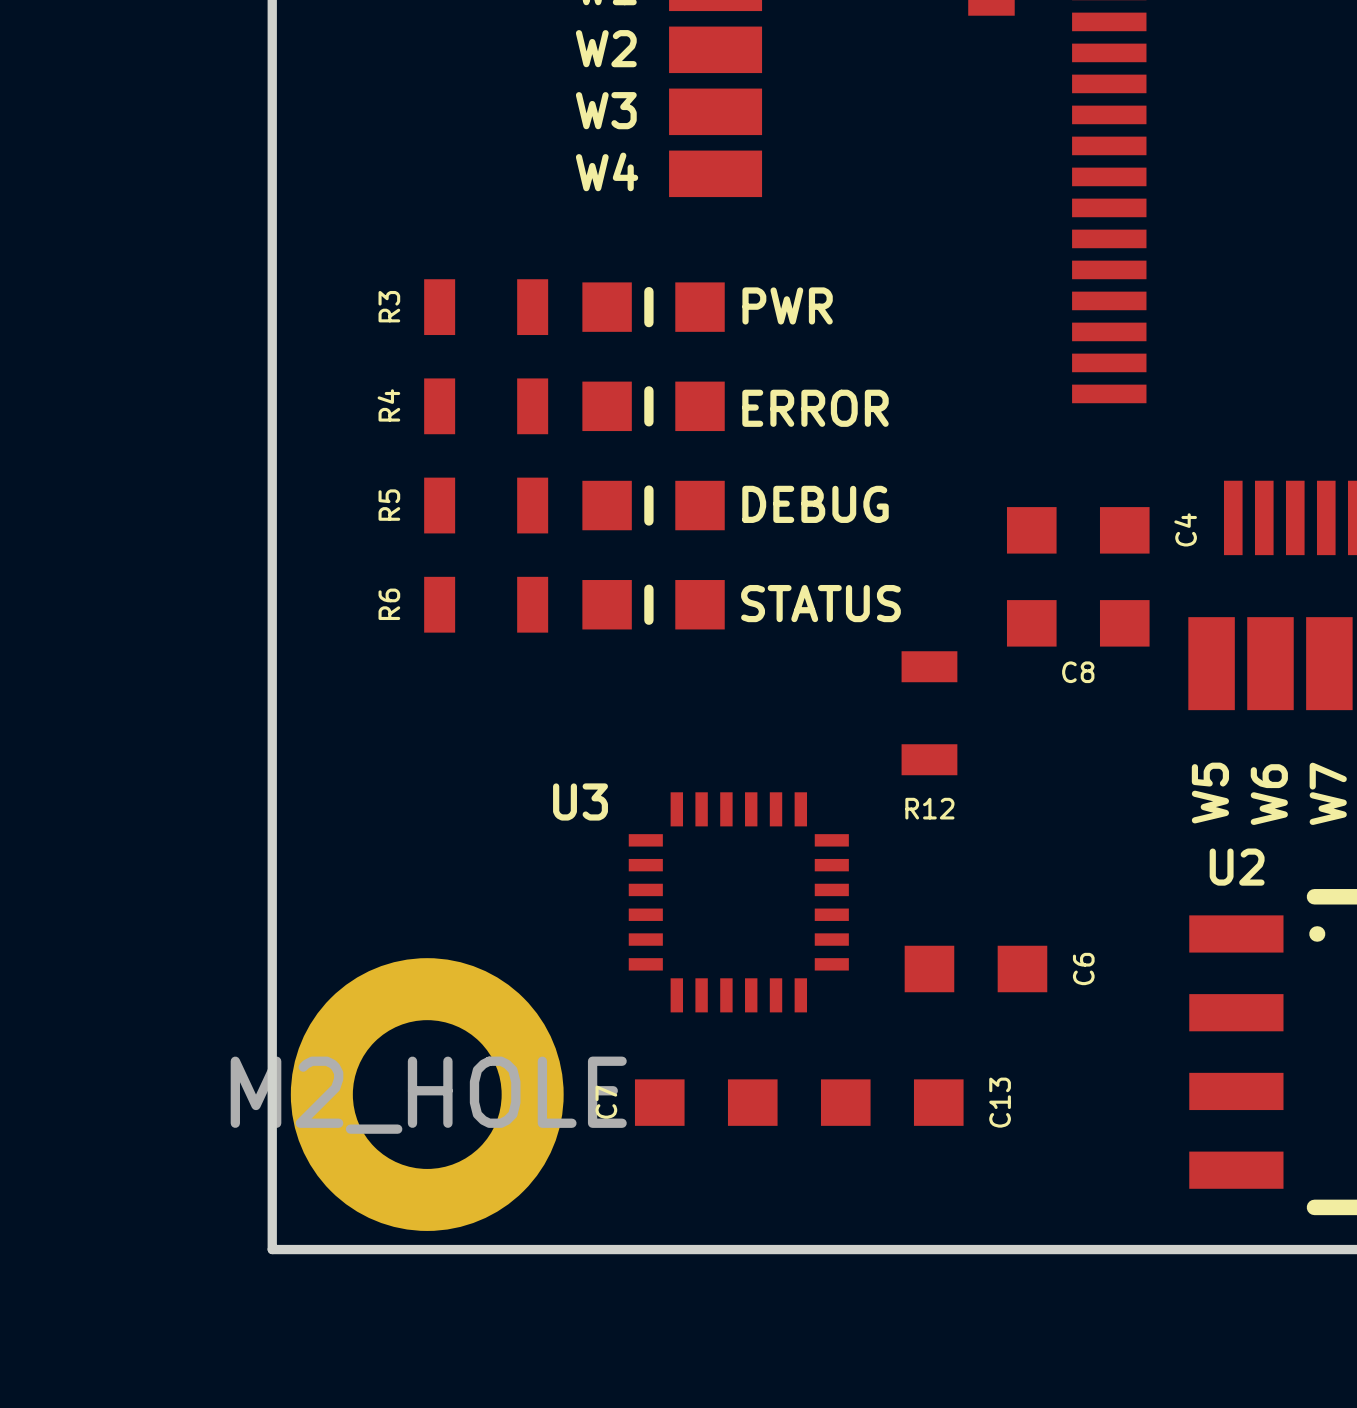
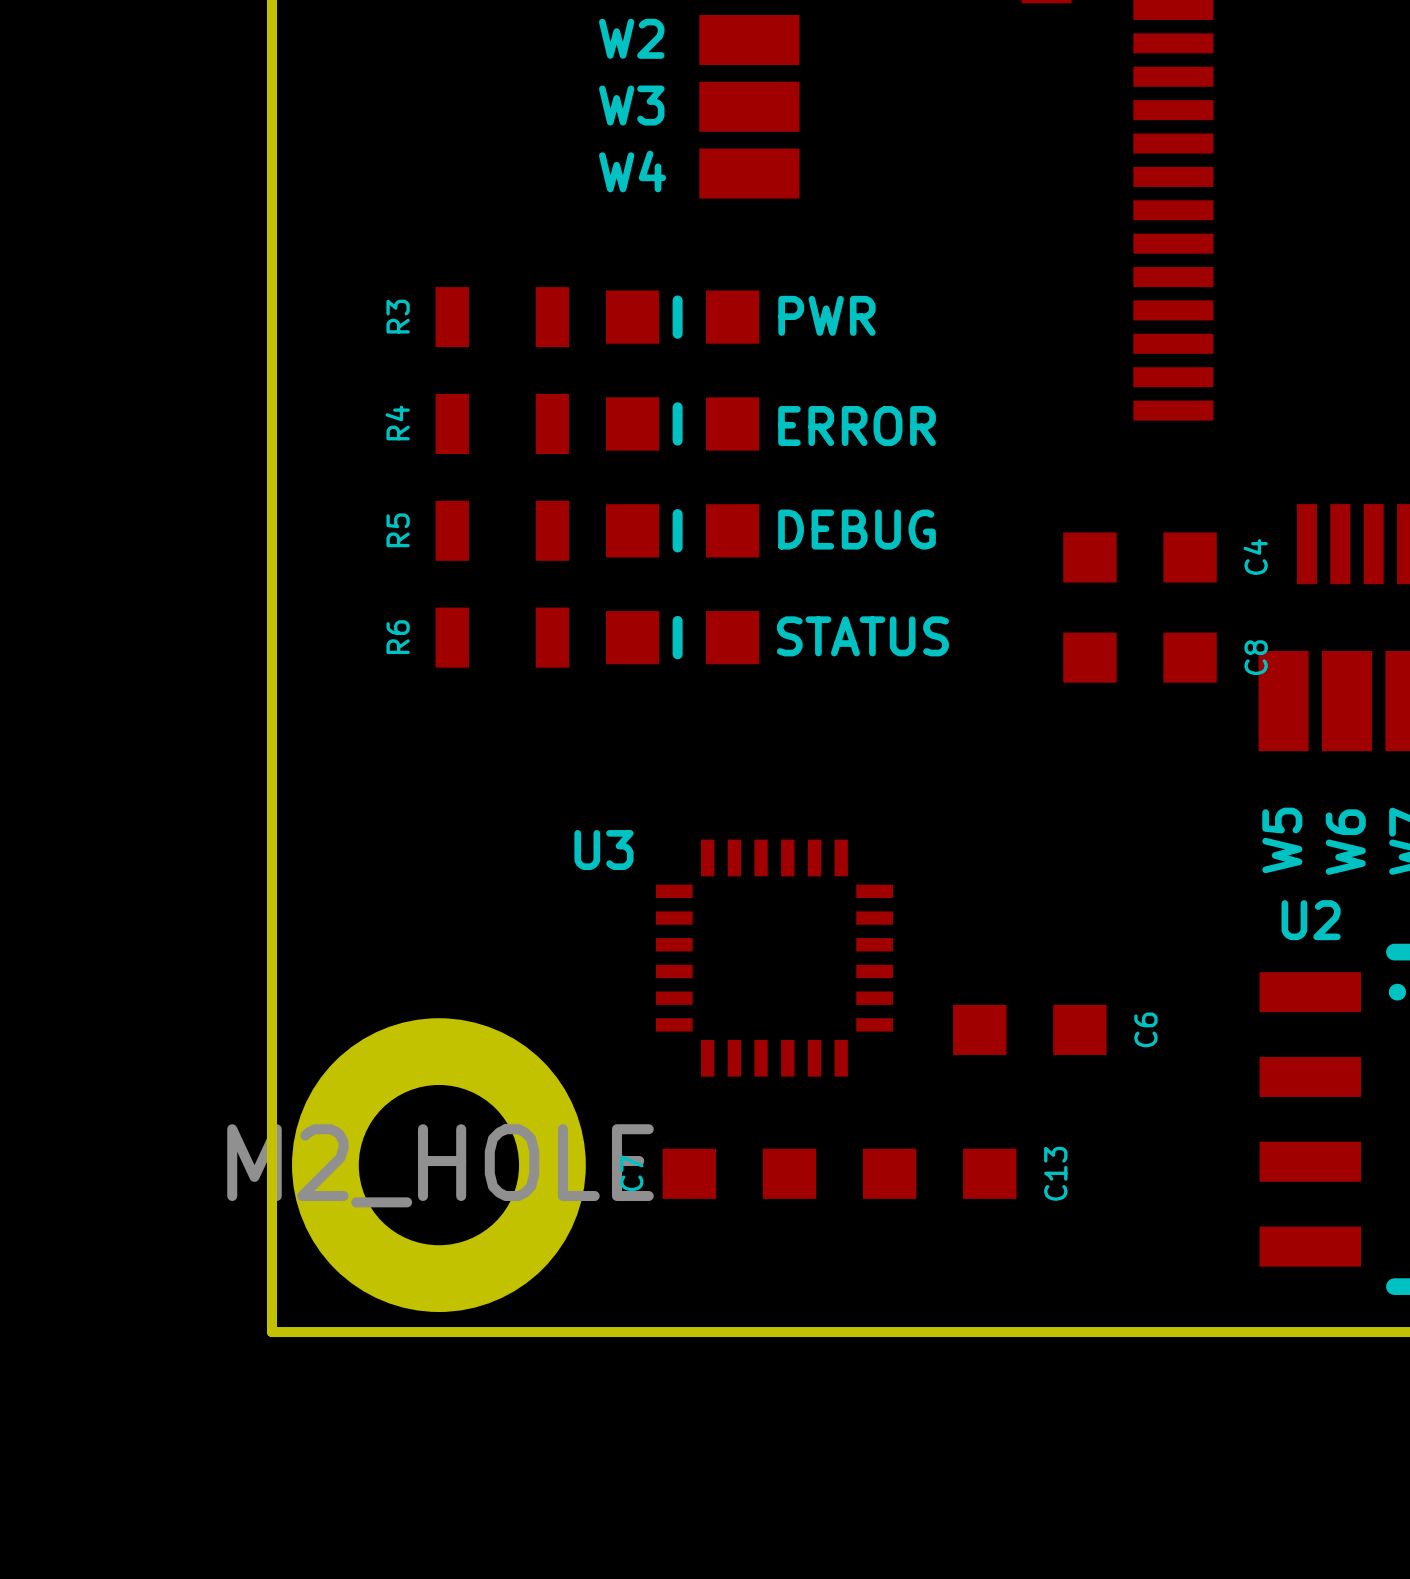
C8 name rotation: 0° (1078, 672) -> 90° counterclockwise (1256, 657)
C8 name position: C8 (1078, 672) -> C8 (1256, 657)
R12: (929, 713) -> none

